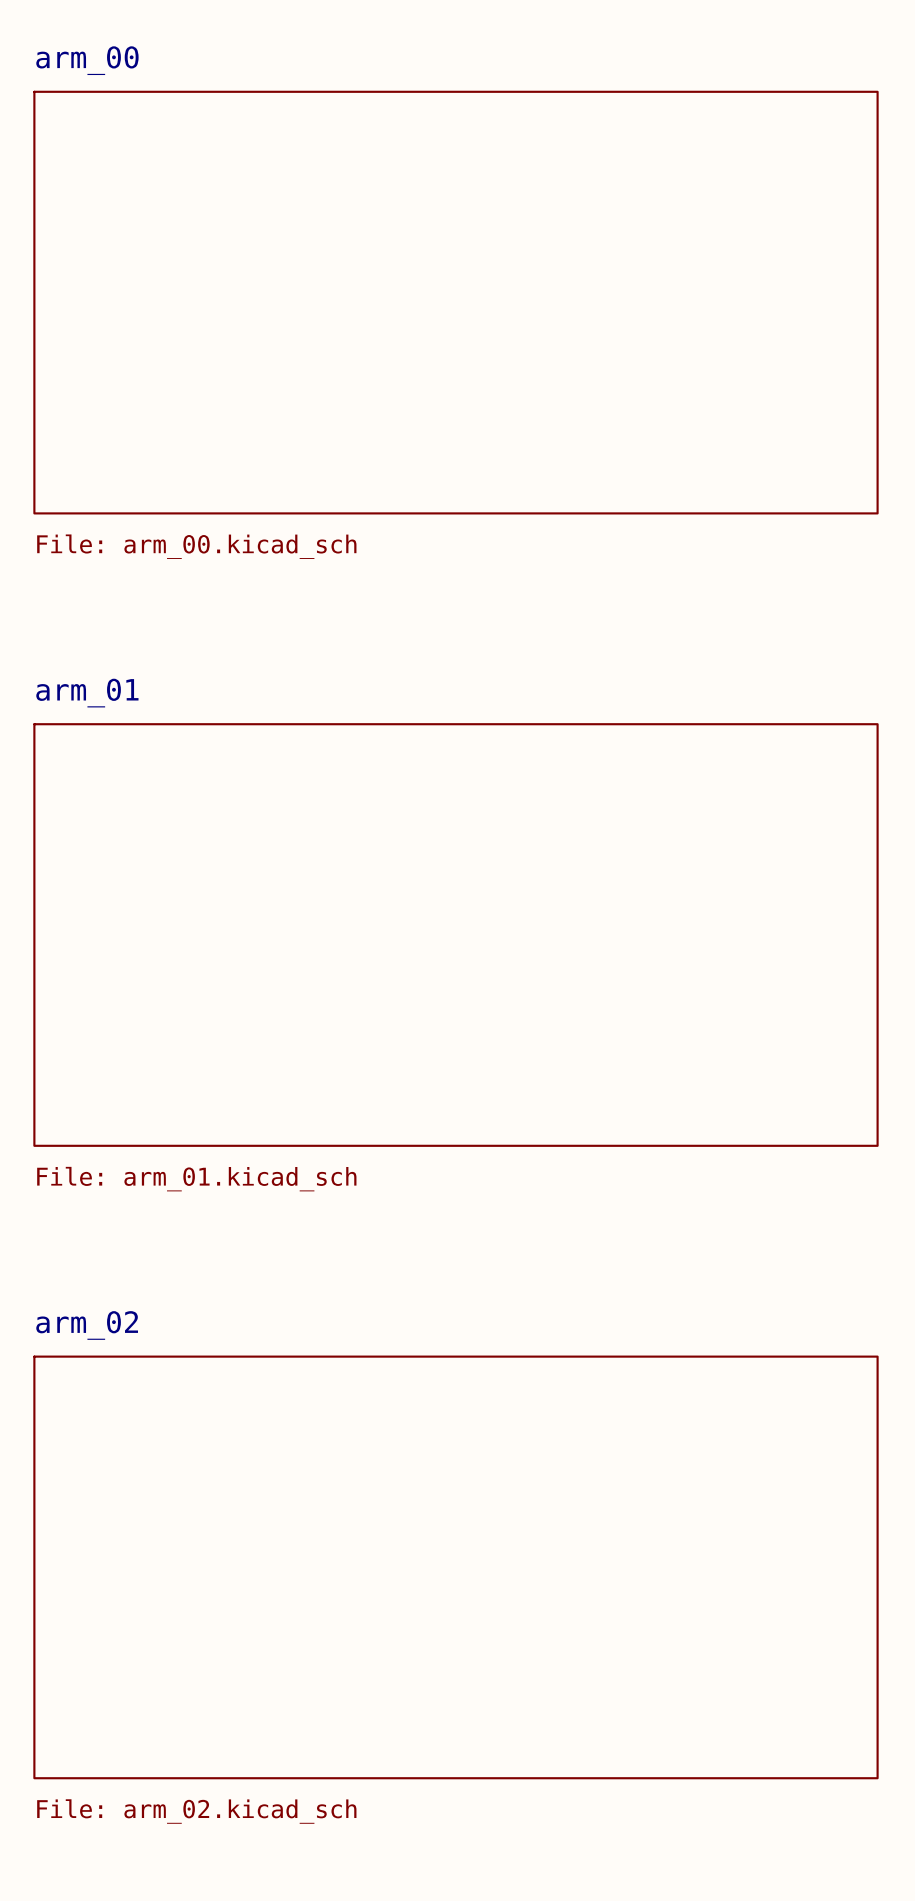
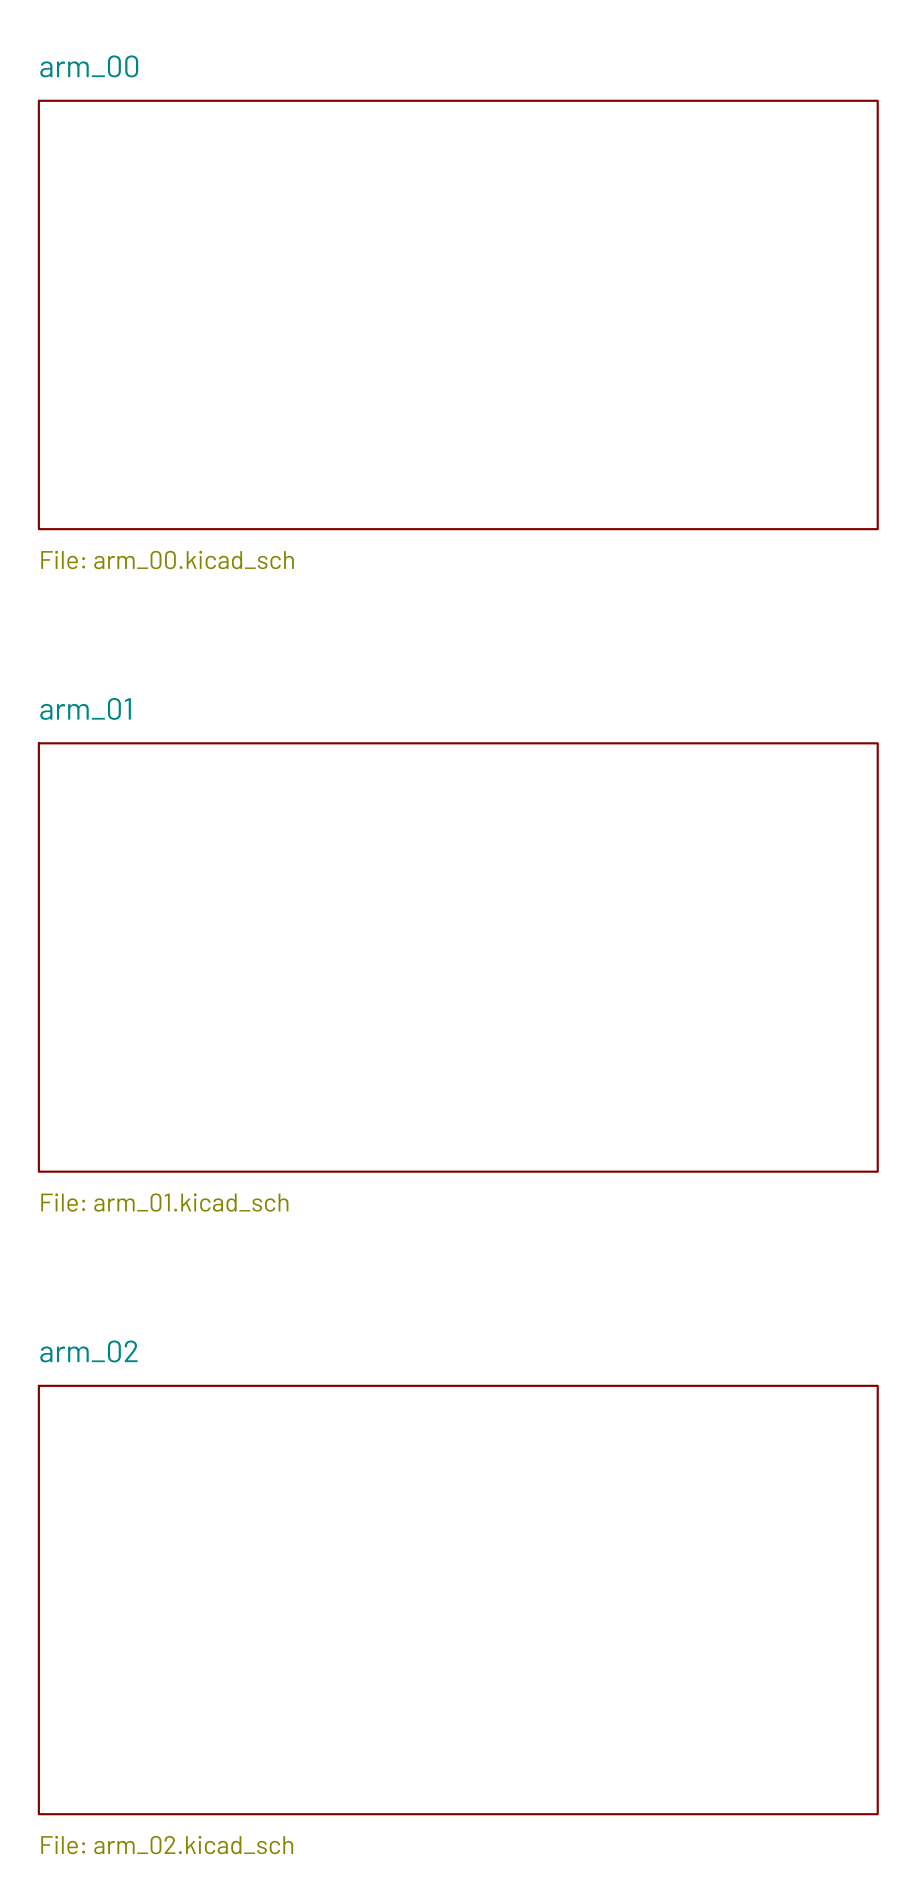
sheet arm_00 shape: [33, 90, 879, 515] -> [37, 99, 879, 531]
sheet arm_01 shape: [33, 723, 879, 1147] -> [37, 742, 879, 1173]
sheet arm_02 shape: [33, 1355, 879, 1780] -> [37, 1384, 879, 1816]

